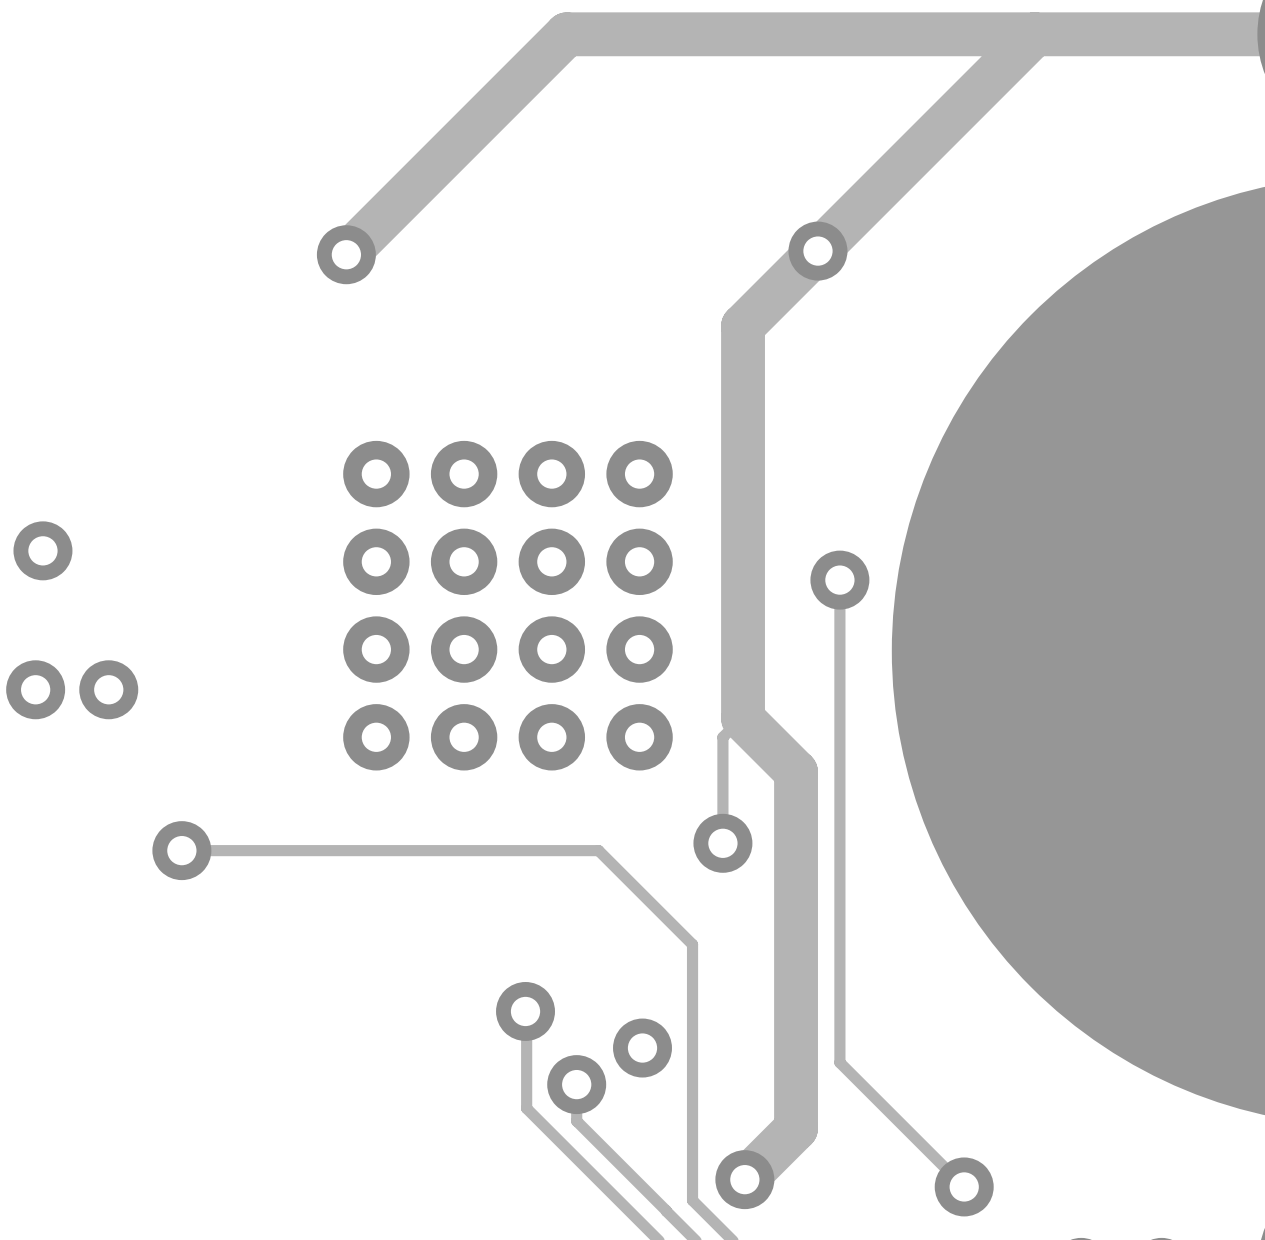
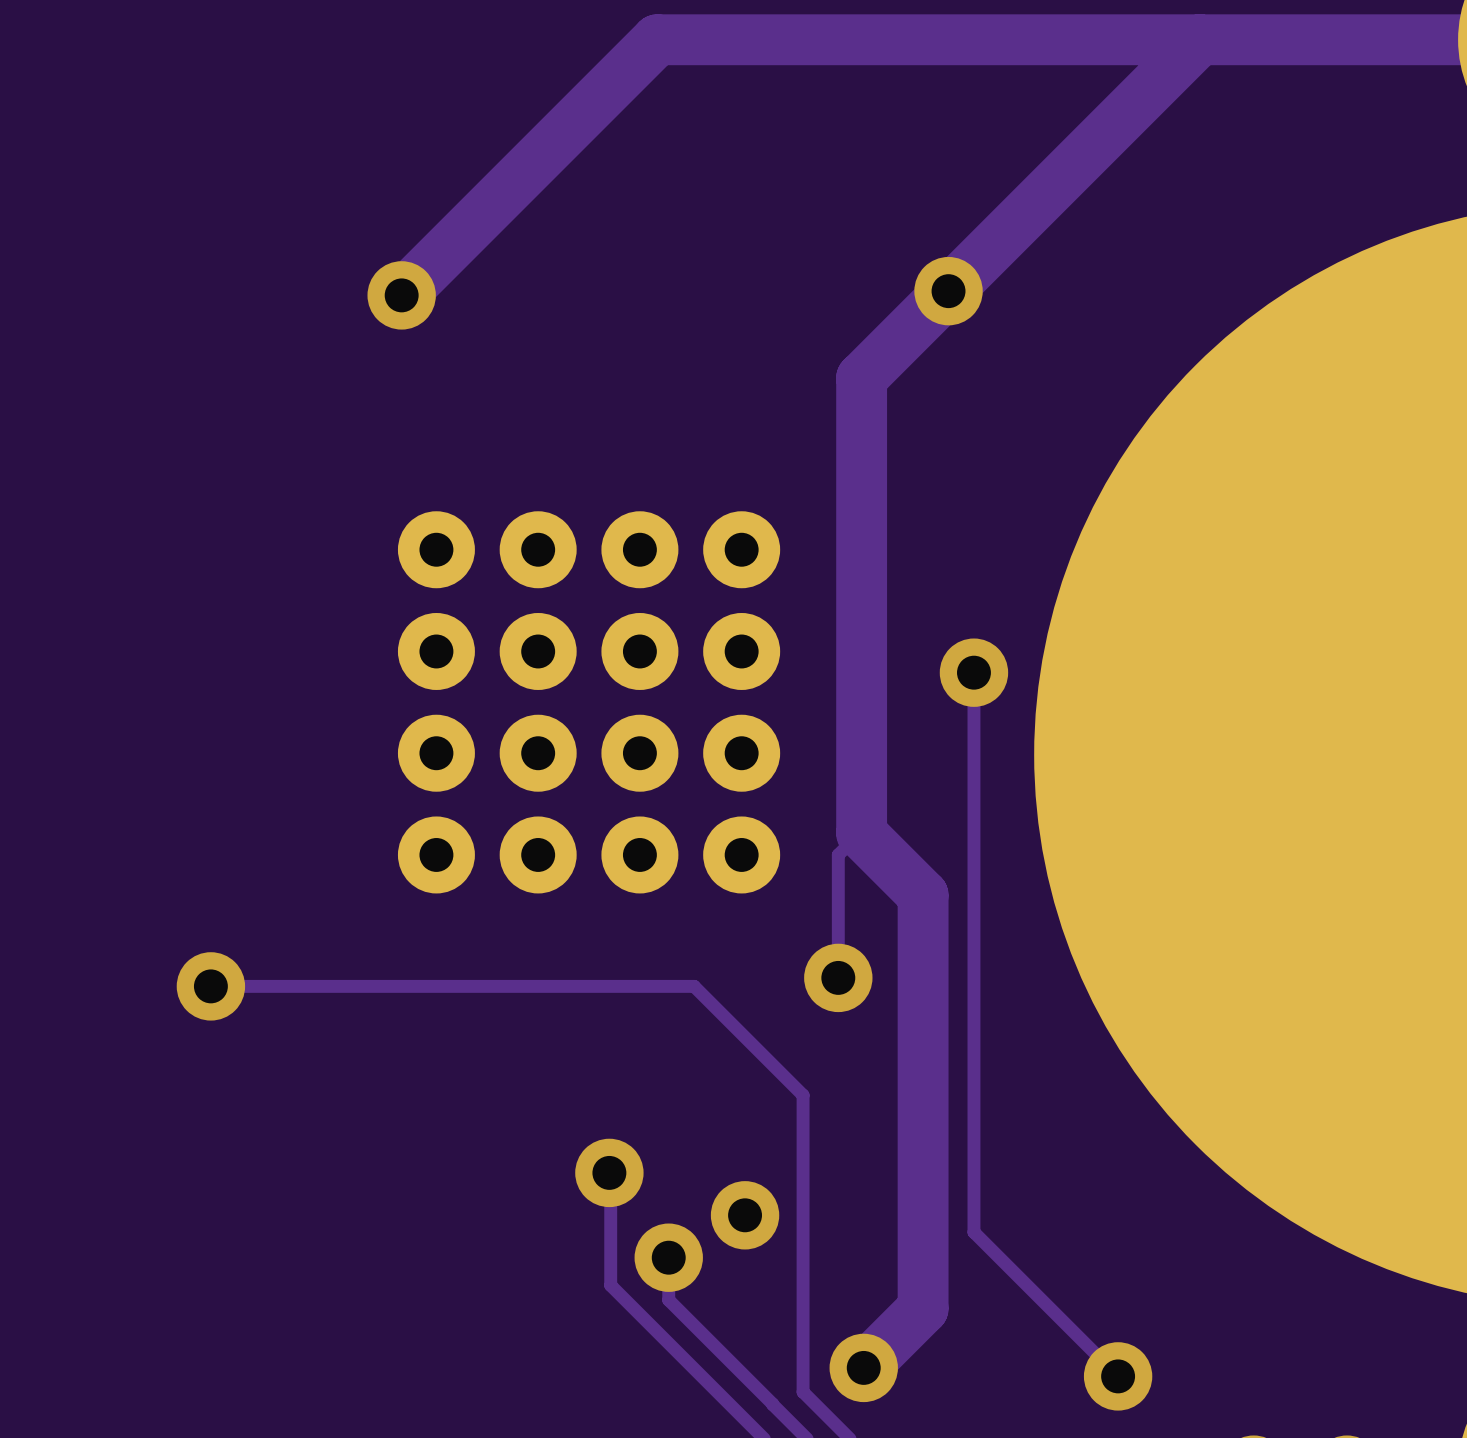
via: (42, 550) -> none
via: (35, 689) -> none
via: (108, 689) -> none

